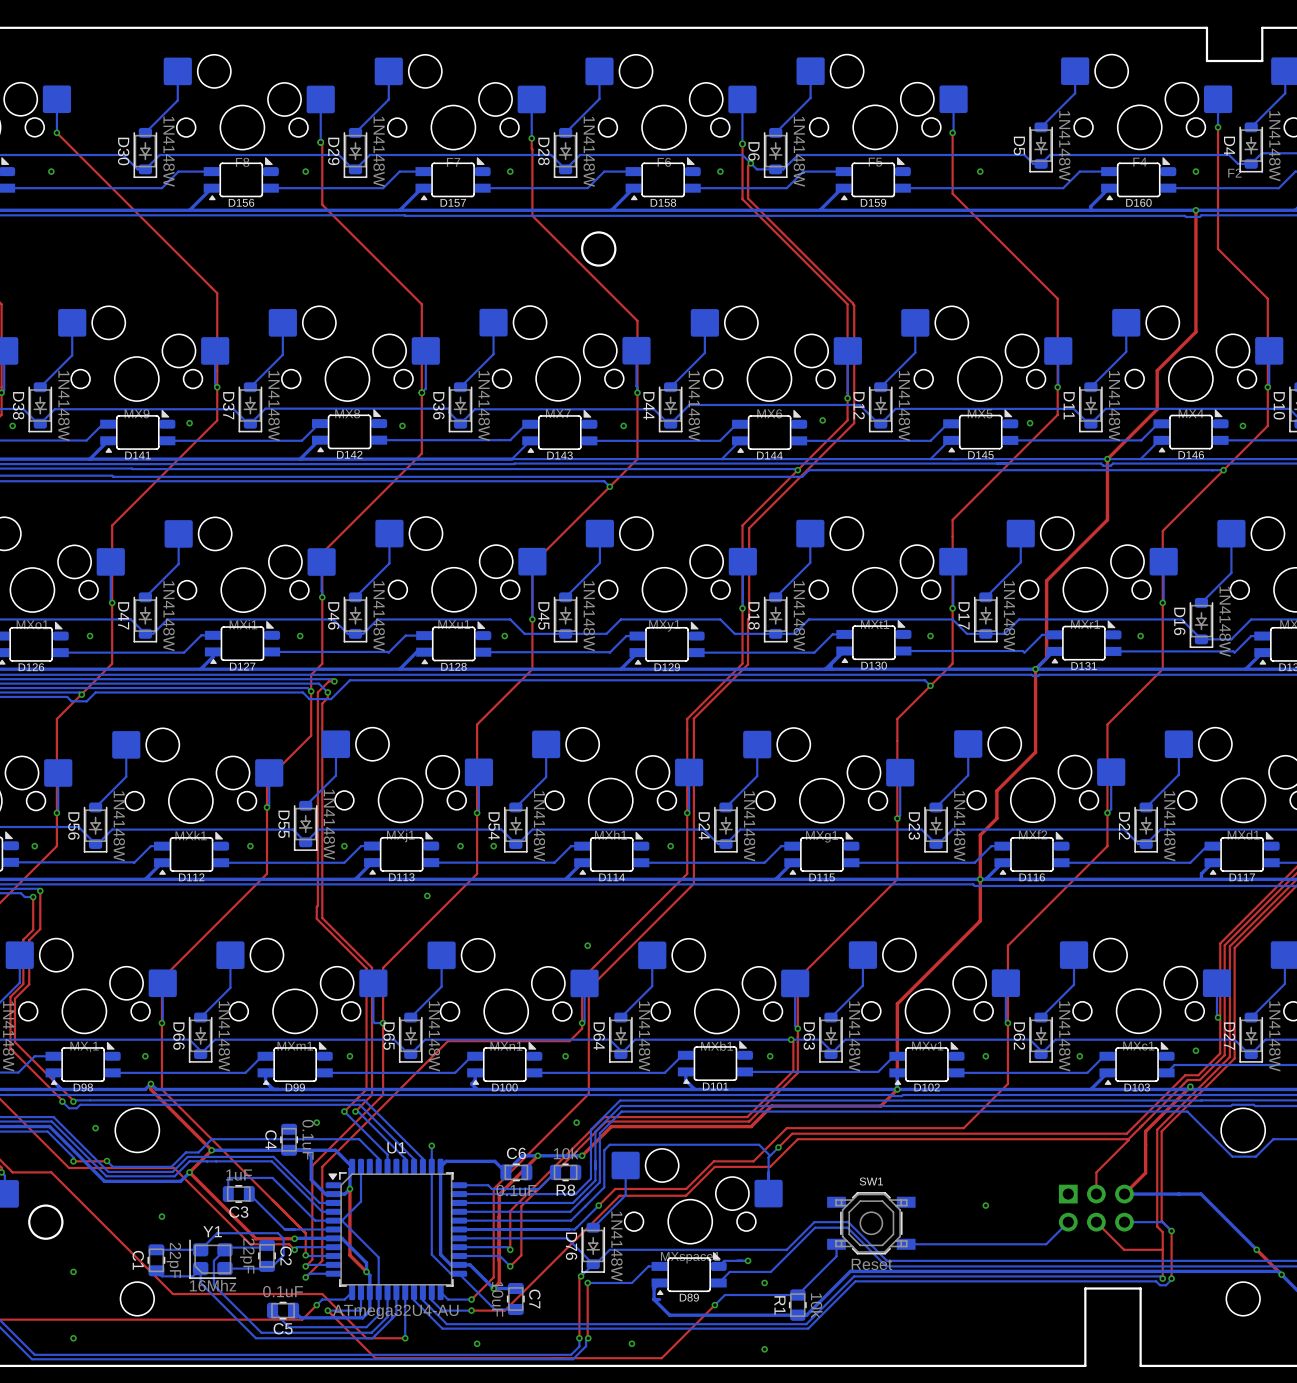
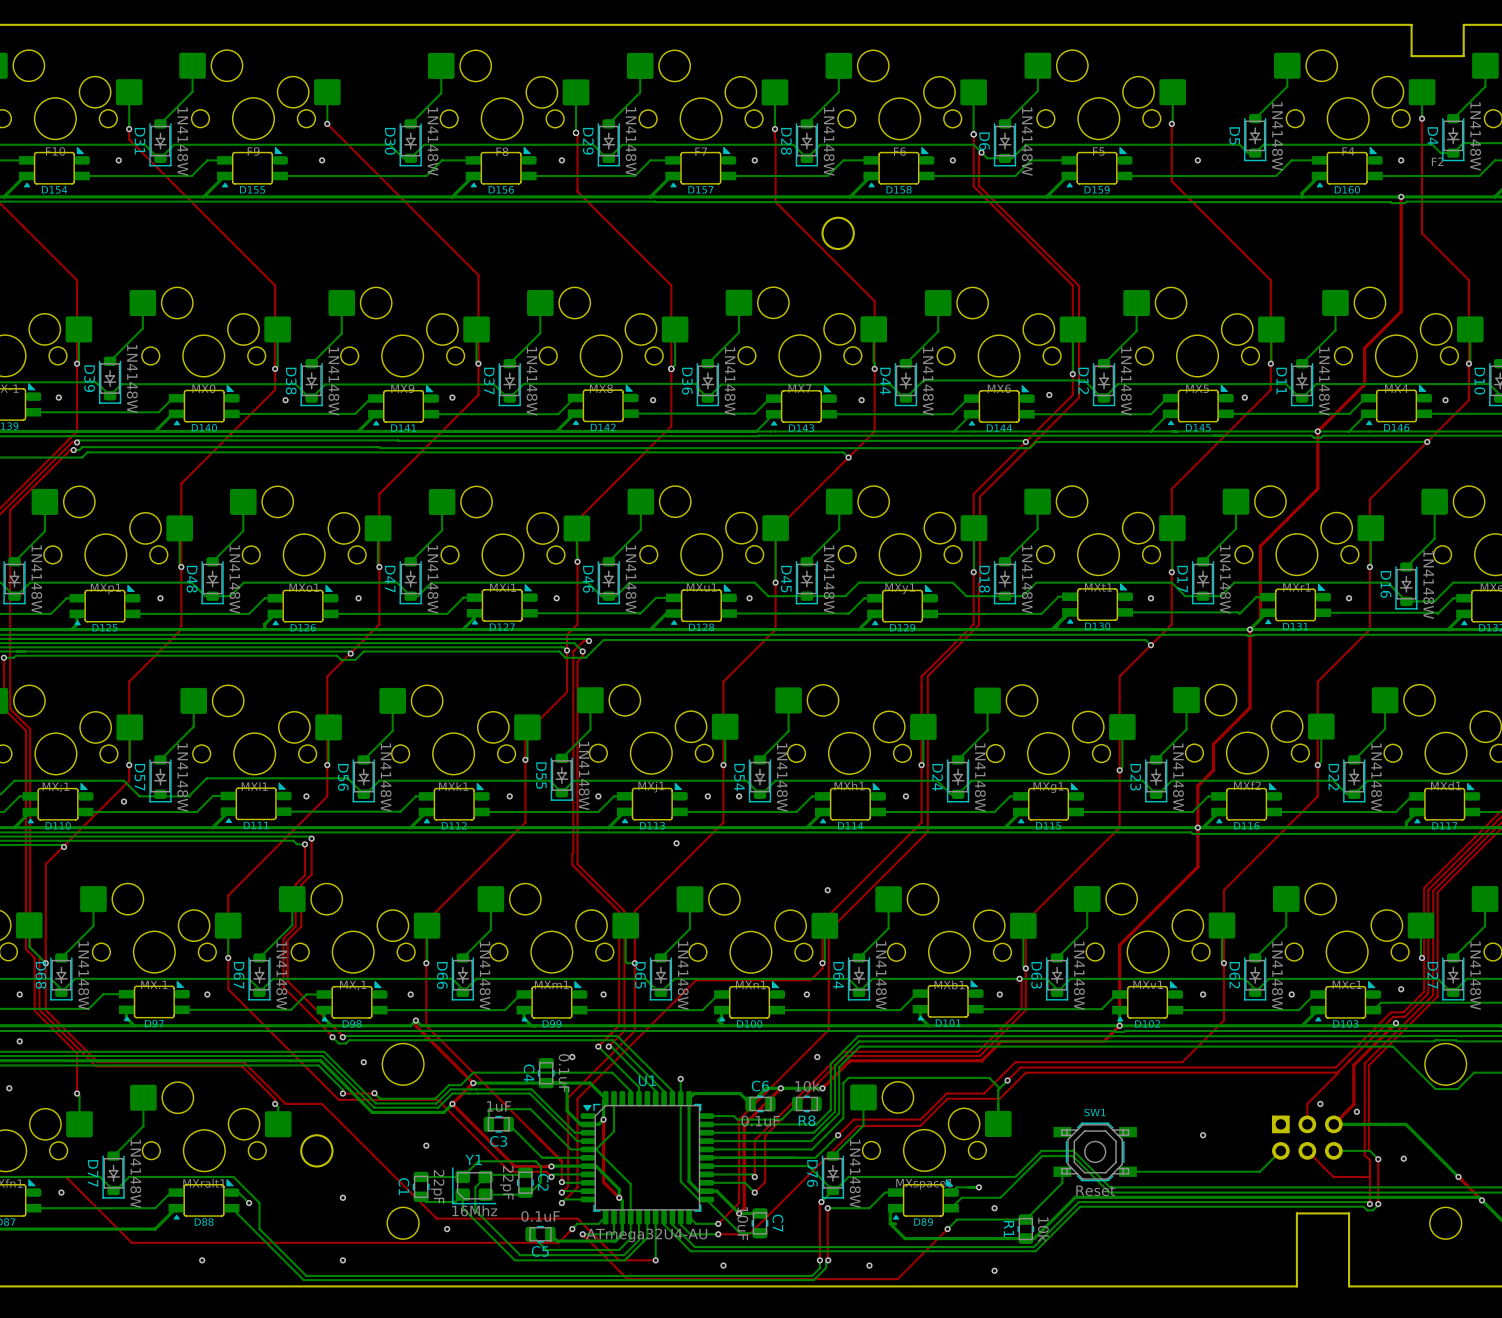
via: none -> (1320, 1103)
via: none -> (1356, 1111)
via: none -> (1403, 1158)
via: none -> (447, 1229)

